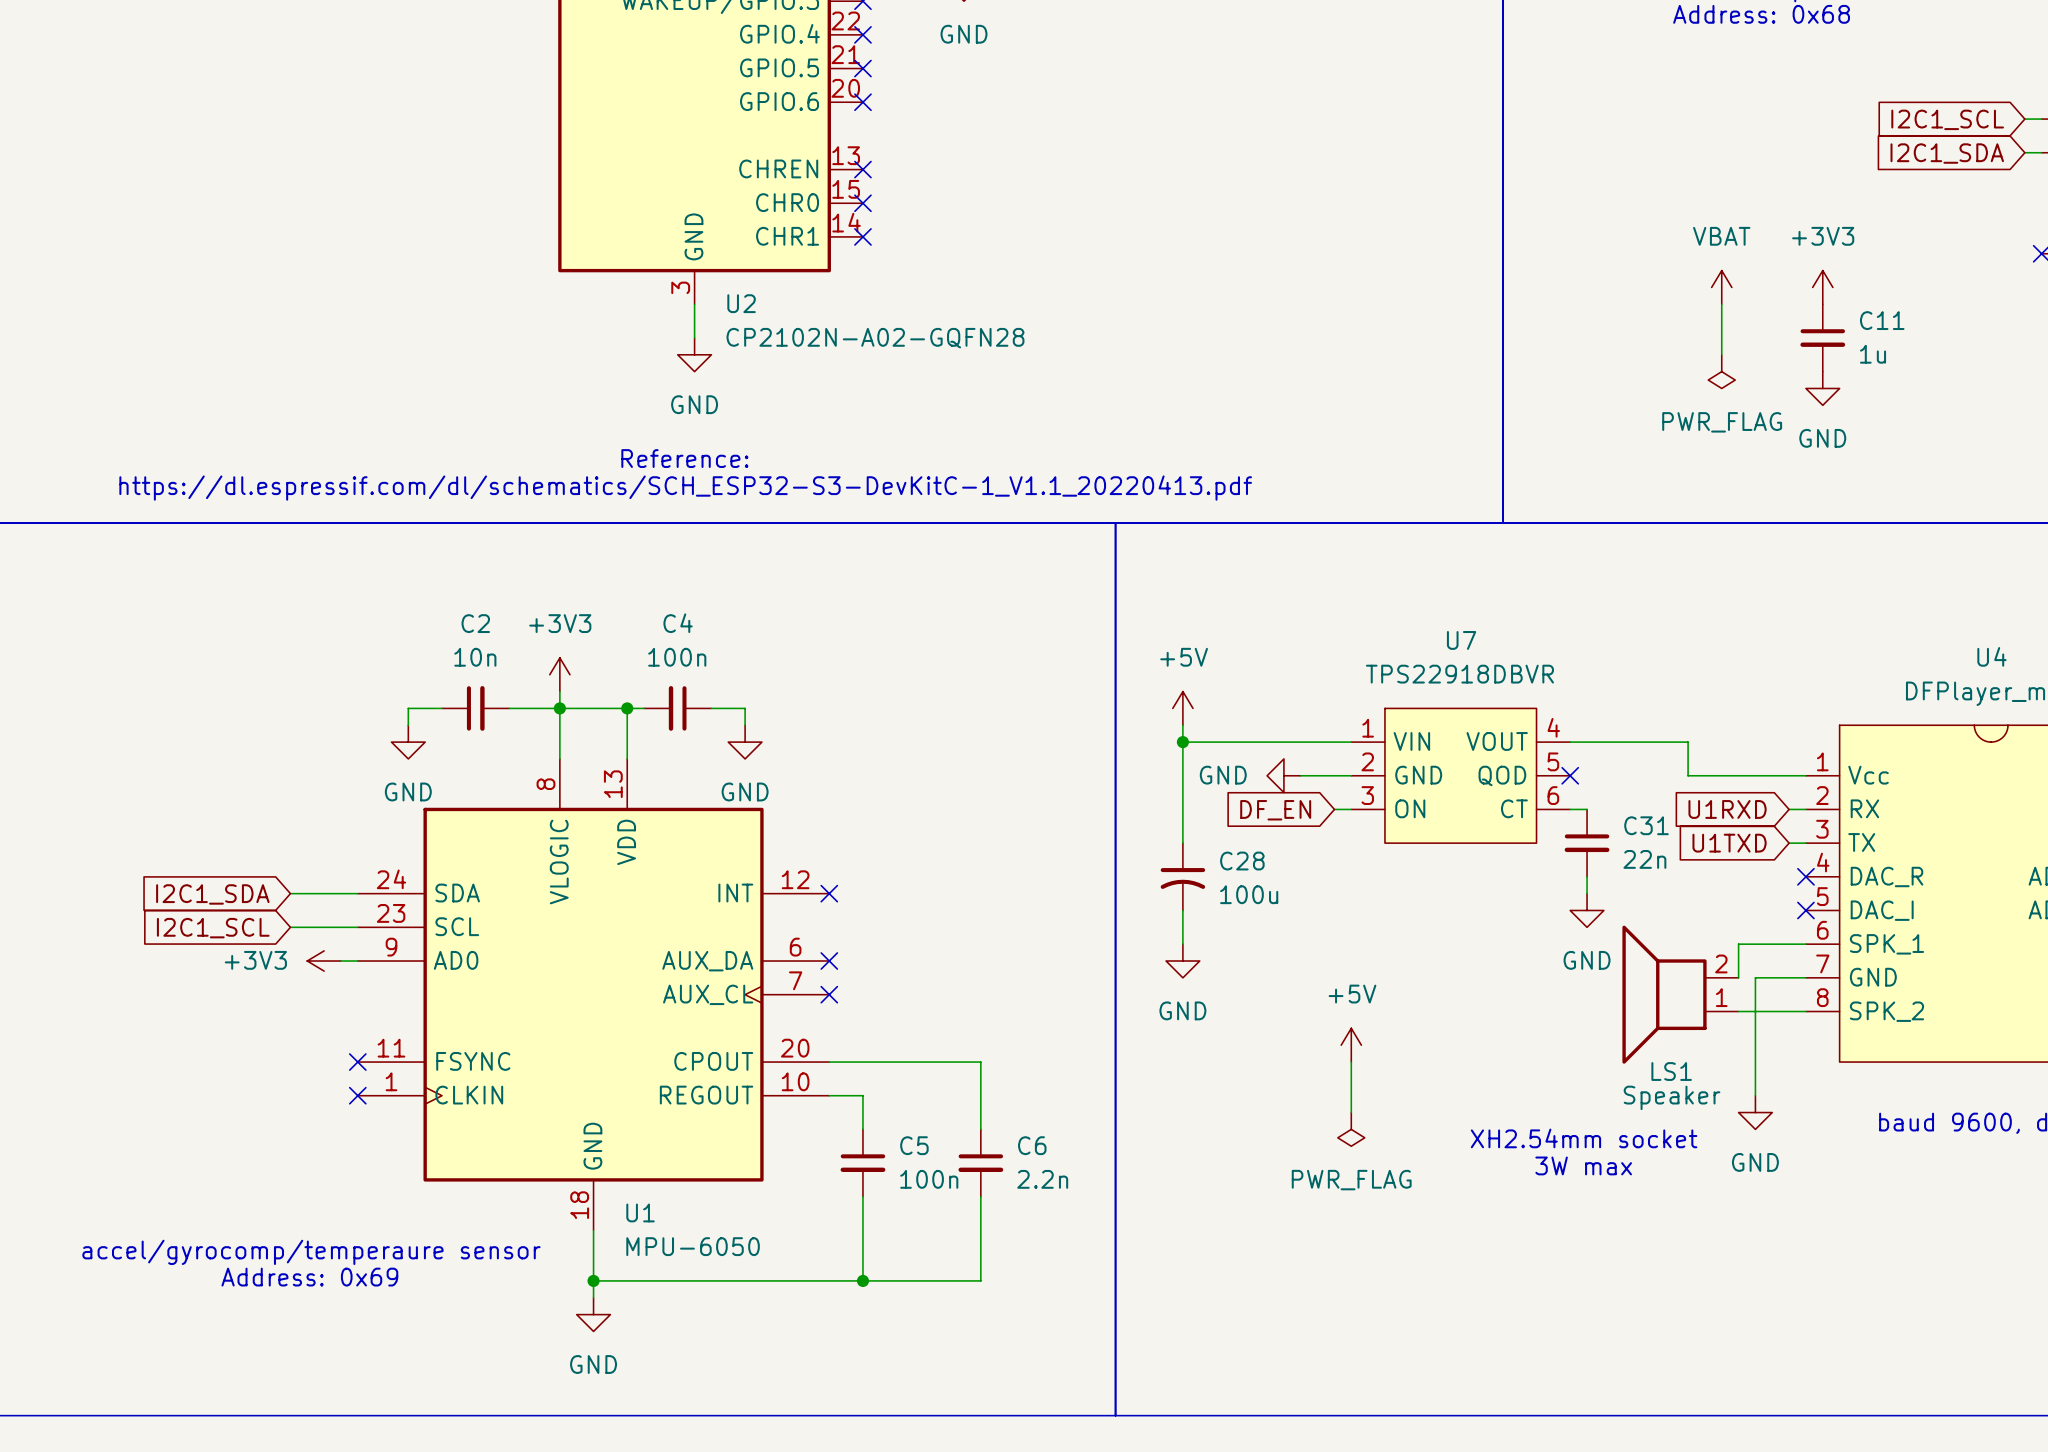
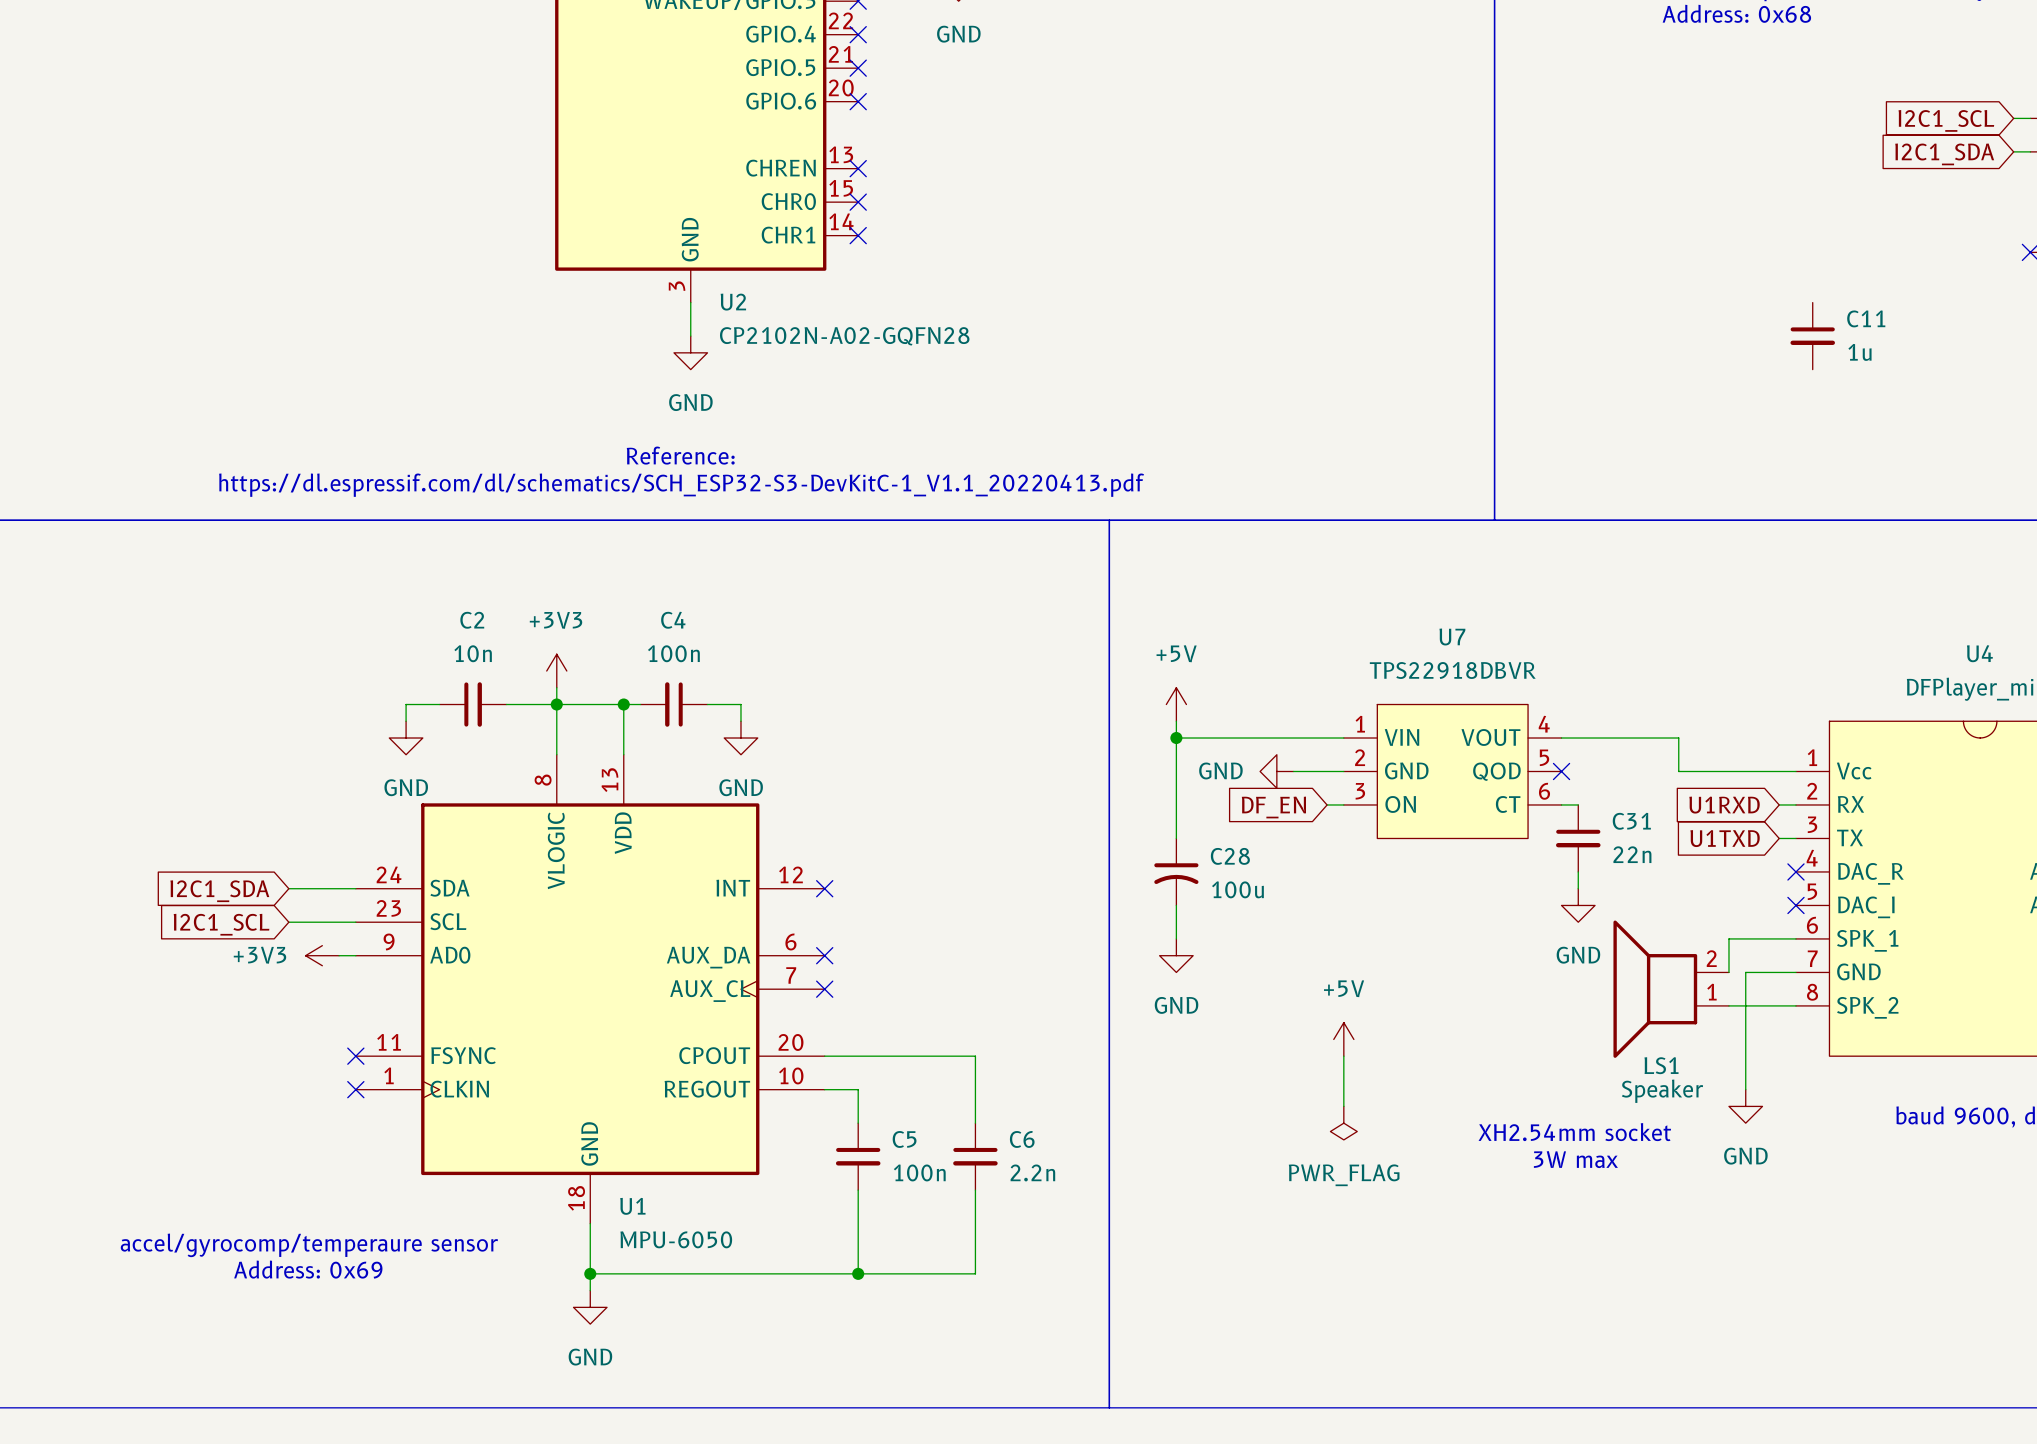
power symbol: VBAT (1721, 287) -> none
power symbol: +3V3 (1822, 287) -> none
wire: (1721, 304) (1721, 354) -> none
power symbol: PWR_FLAG (1721, 371) -> none
power symbol: GND (1822, 388) -> none

